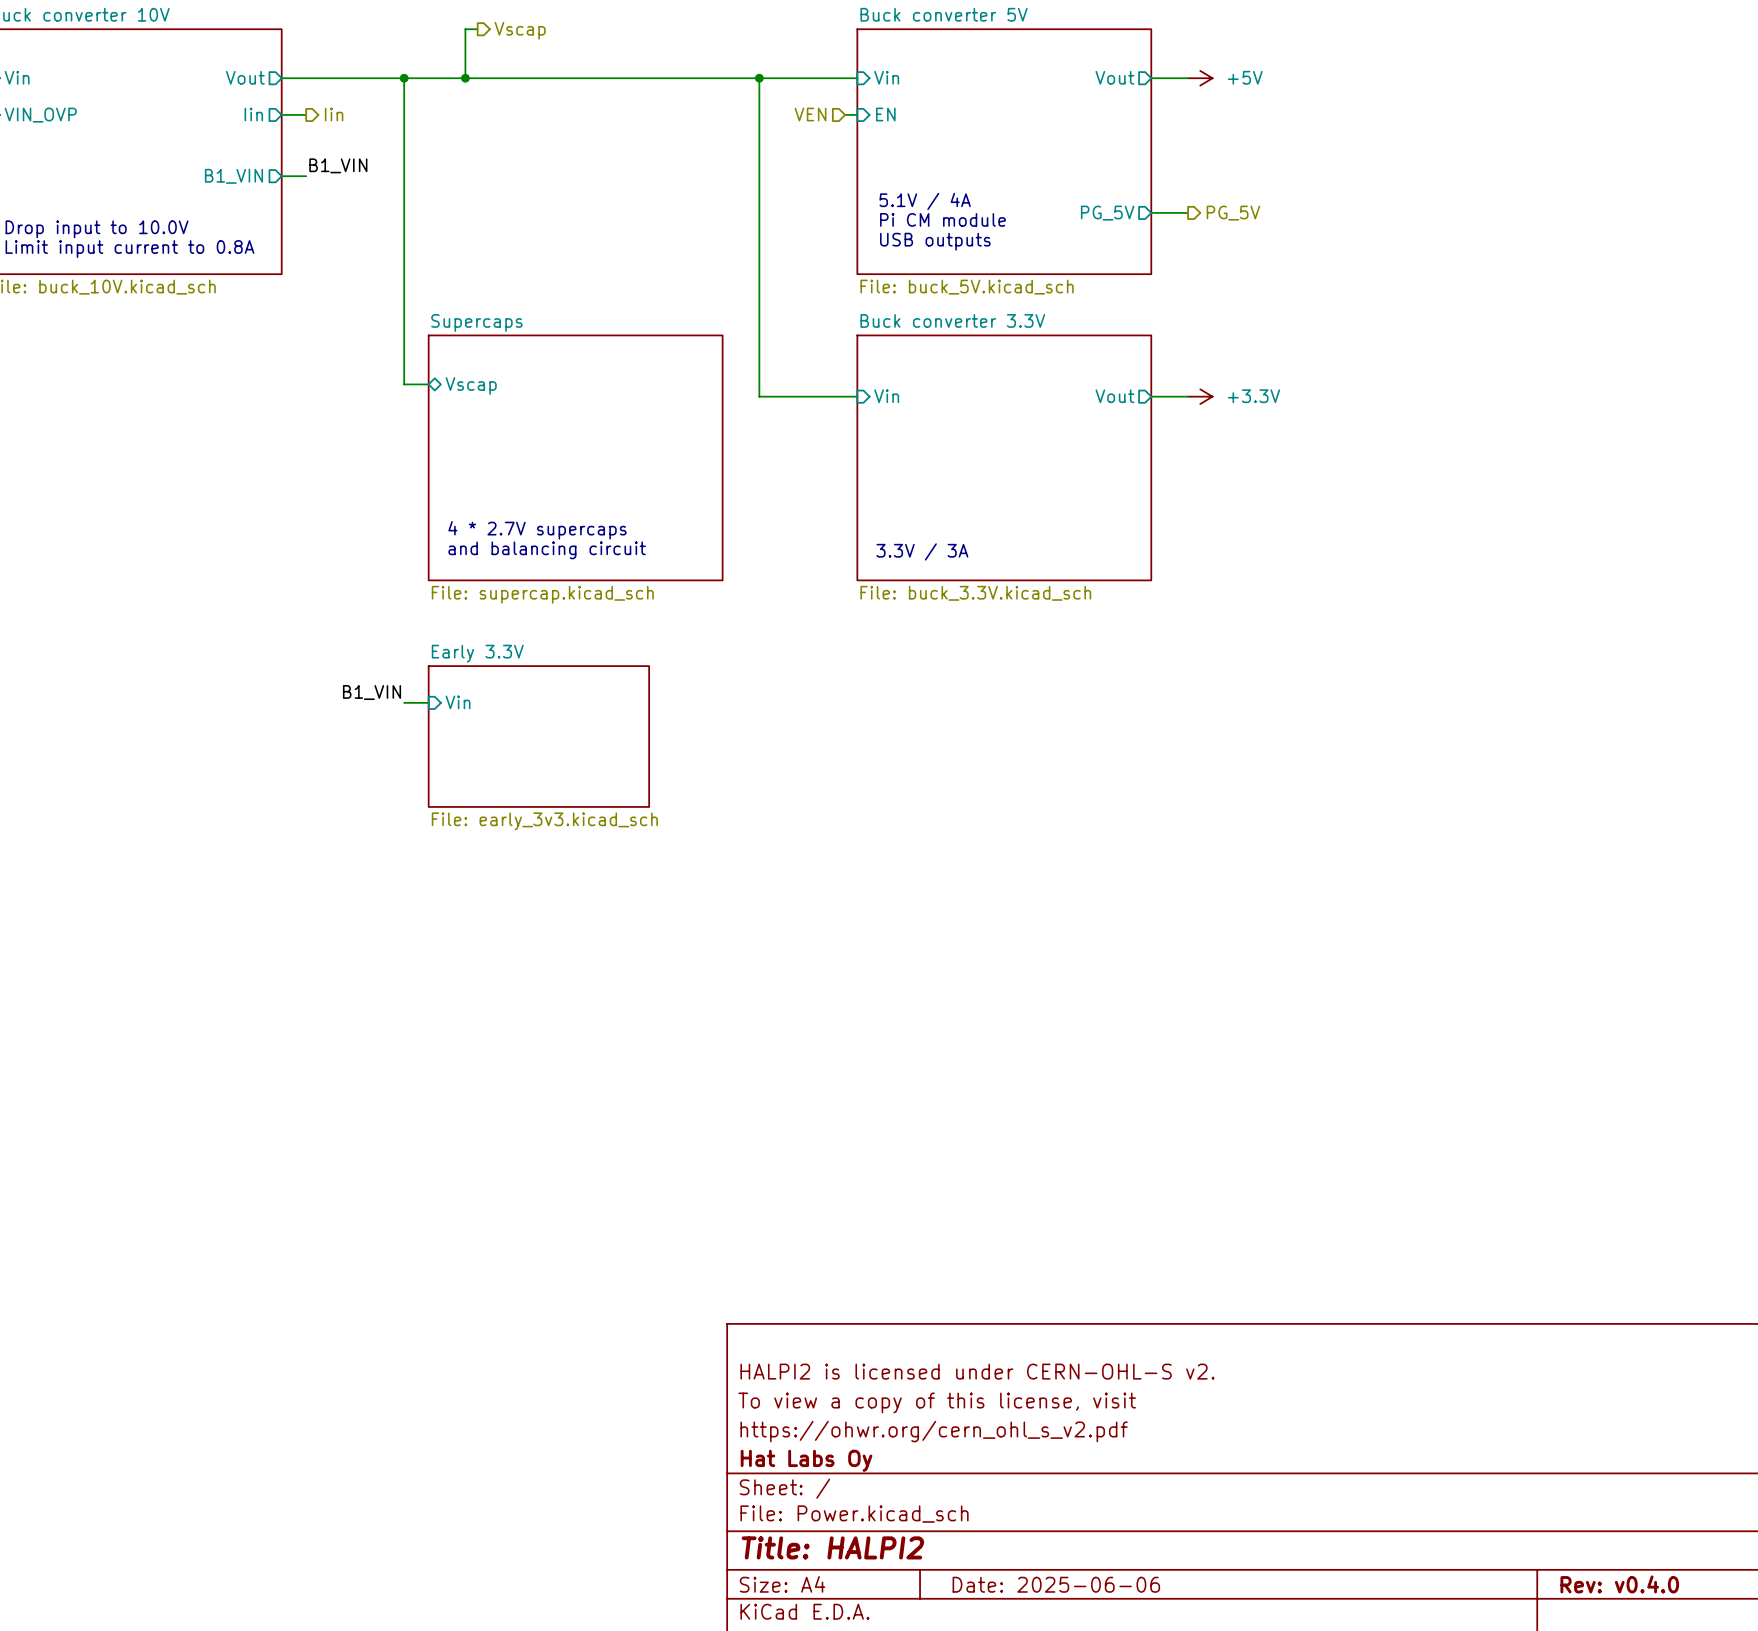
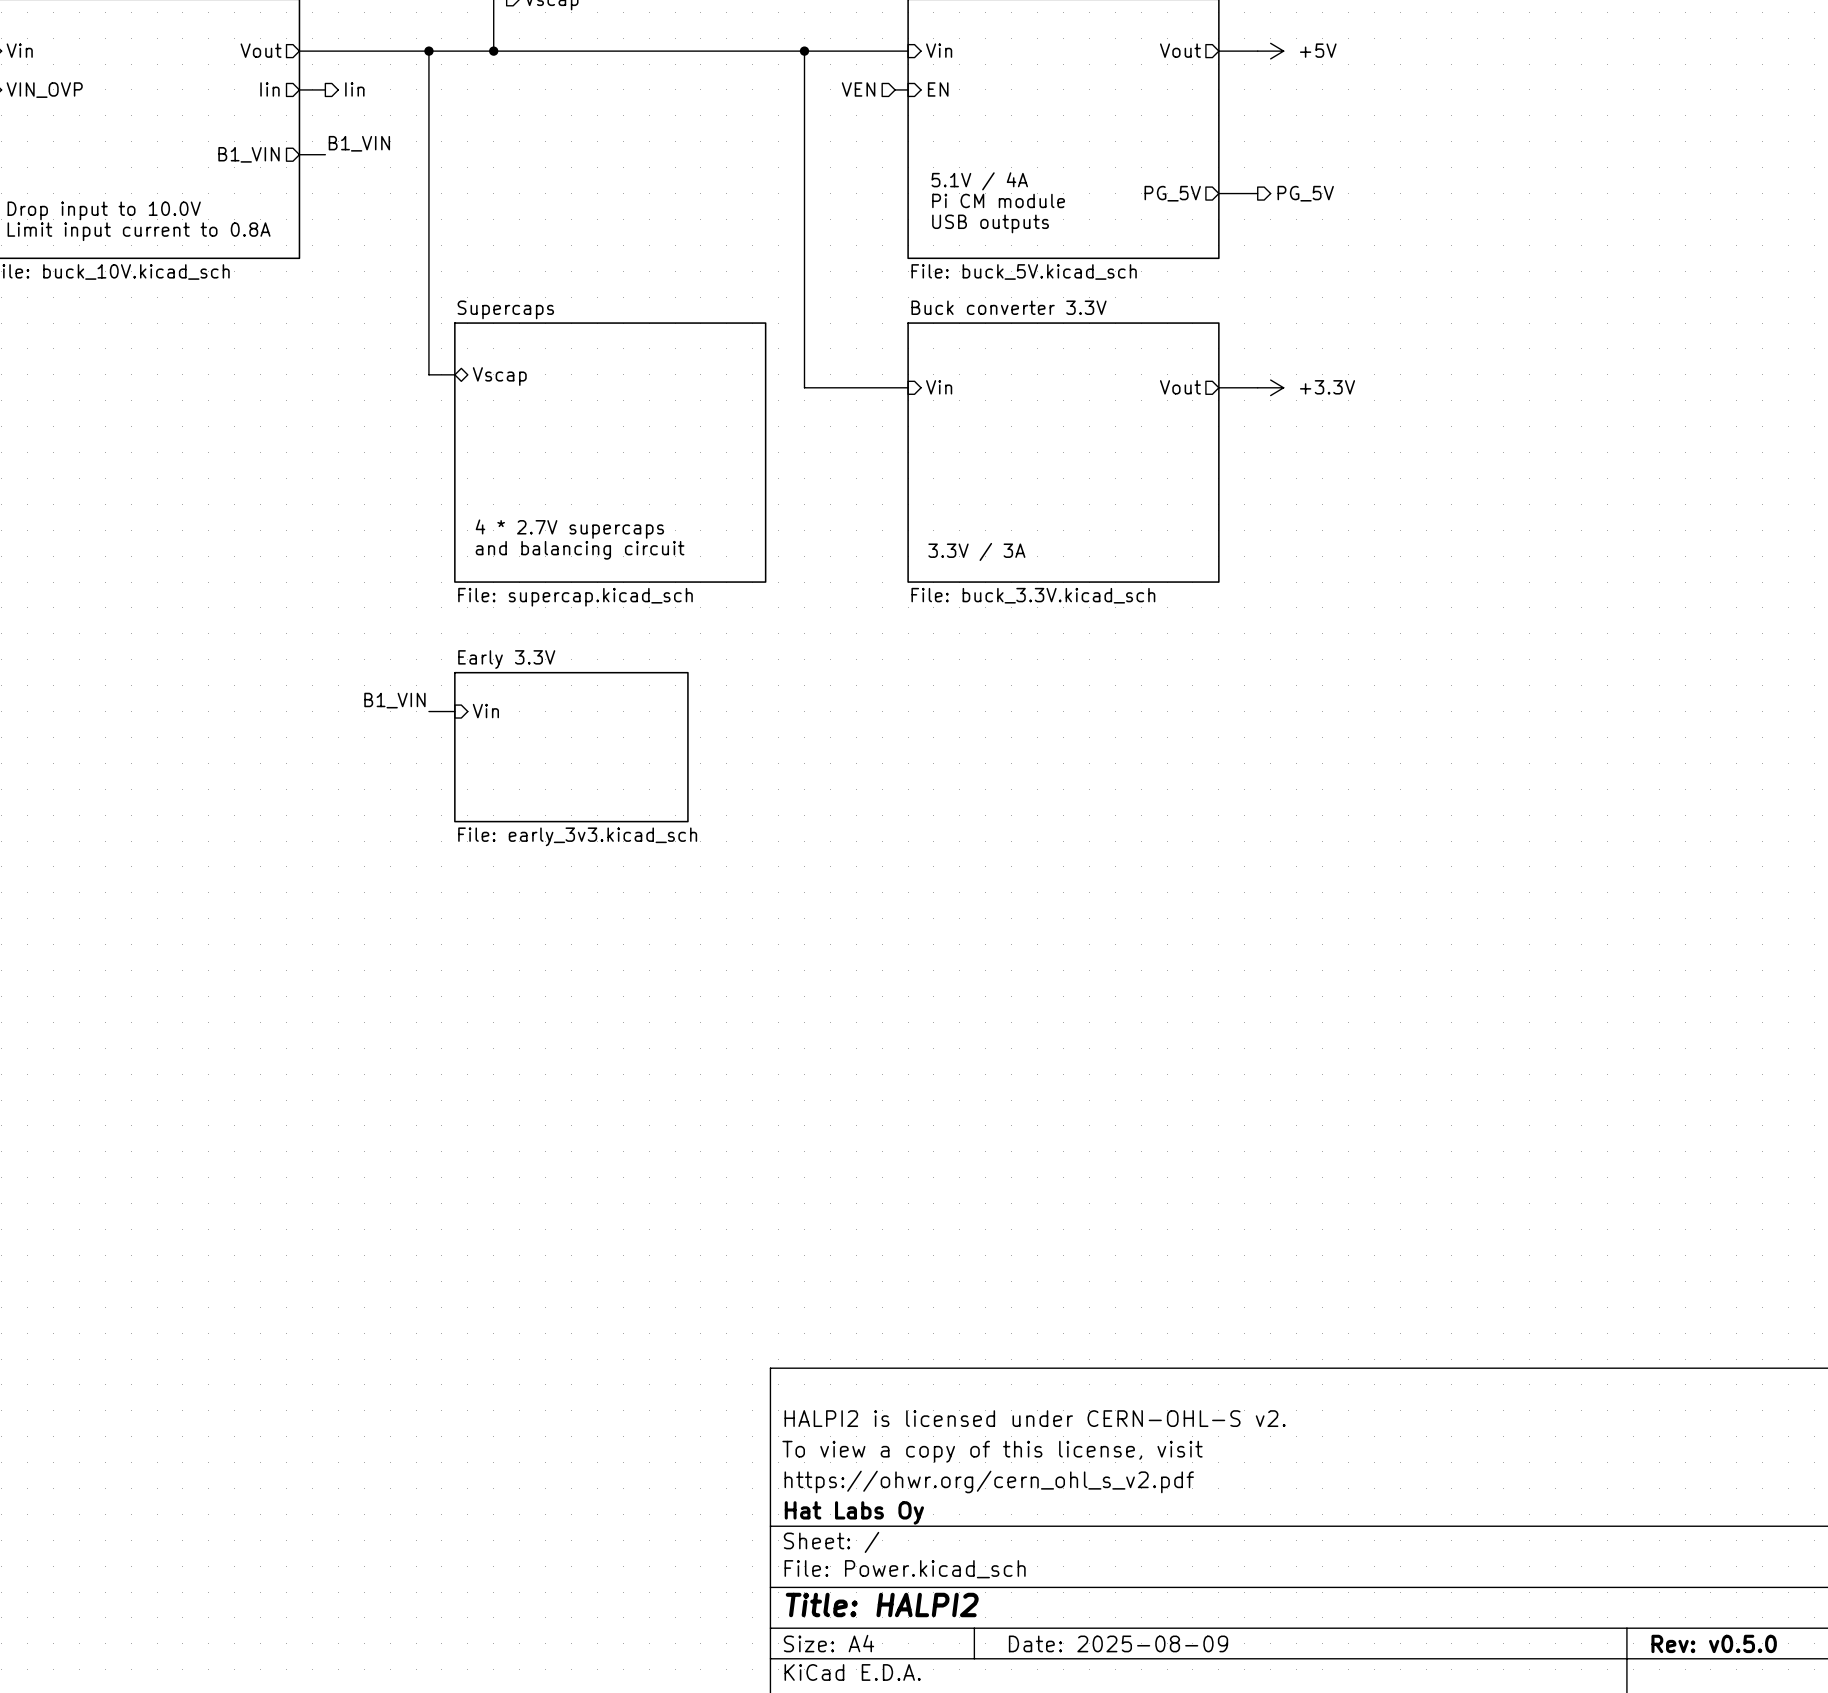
title block: Date: 2025-06-06 (1056, 1584) -> Date: 2025-08-09 (1118, 1643)
title block: Rev: v0.4.0 (1619, 1584) -> Rev: v0.5.0 (1714, 1643)

